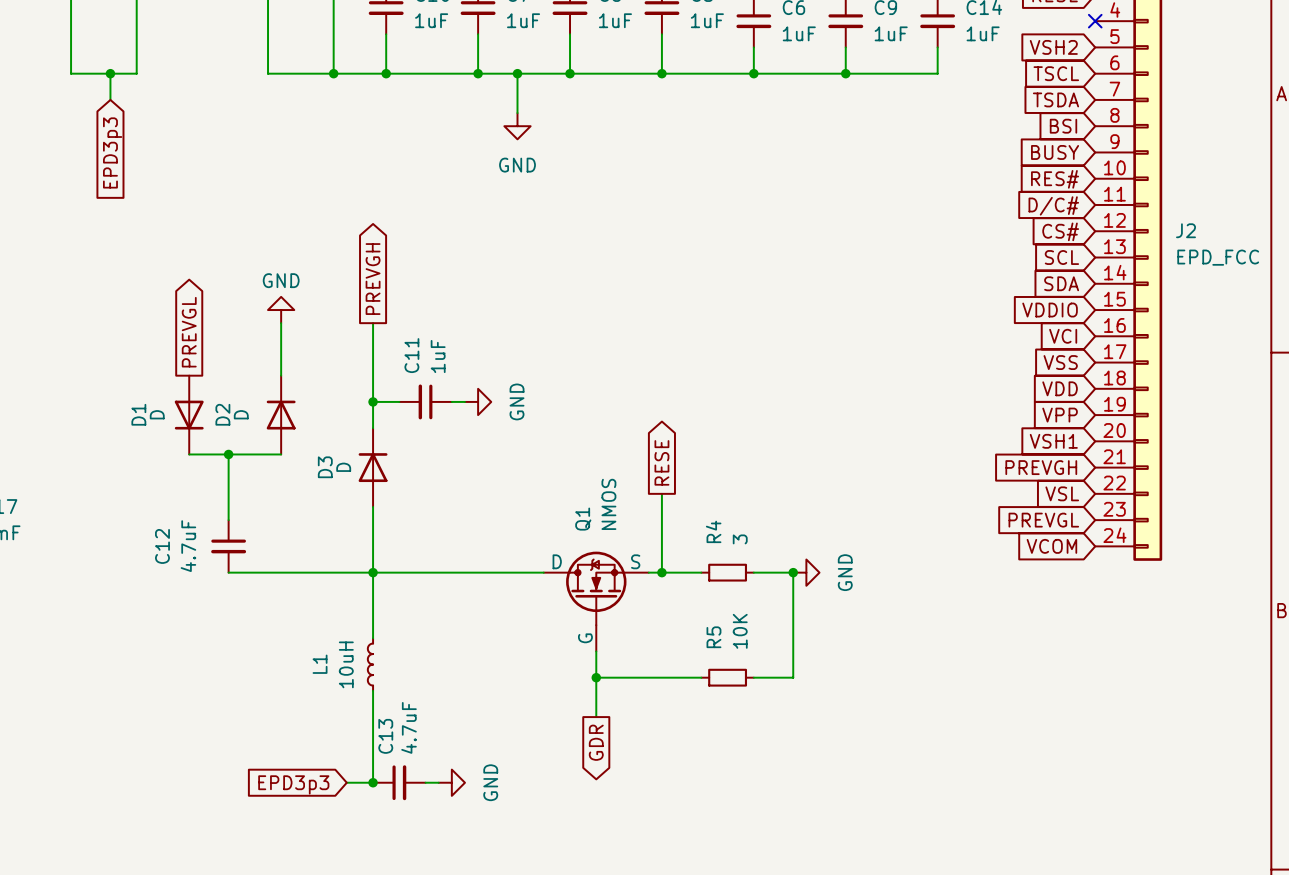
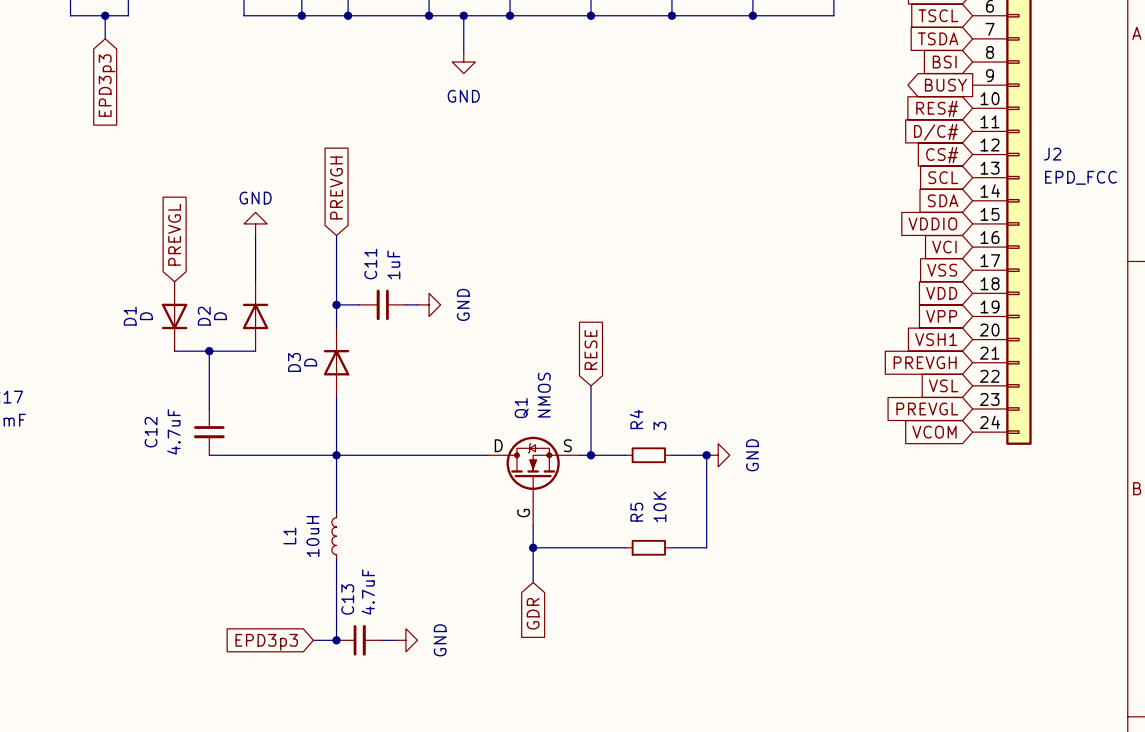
global label shape: input (1055, 152) -> output (945, 85)
global label shape: output (373, 279) -> input (336, 187)
global label shape: output (189, 332) -> input (174, 234)
global label shape: output (661, 462) -> input (590, 349)
global label shape: output (596, 742) -> input (533, 613)

